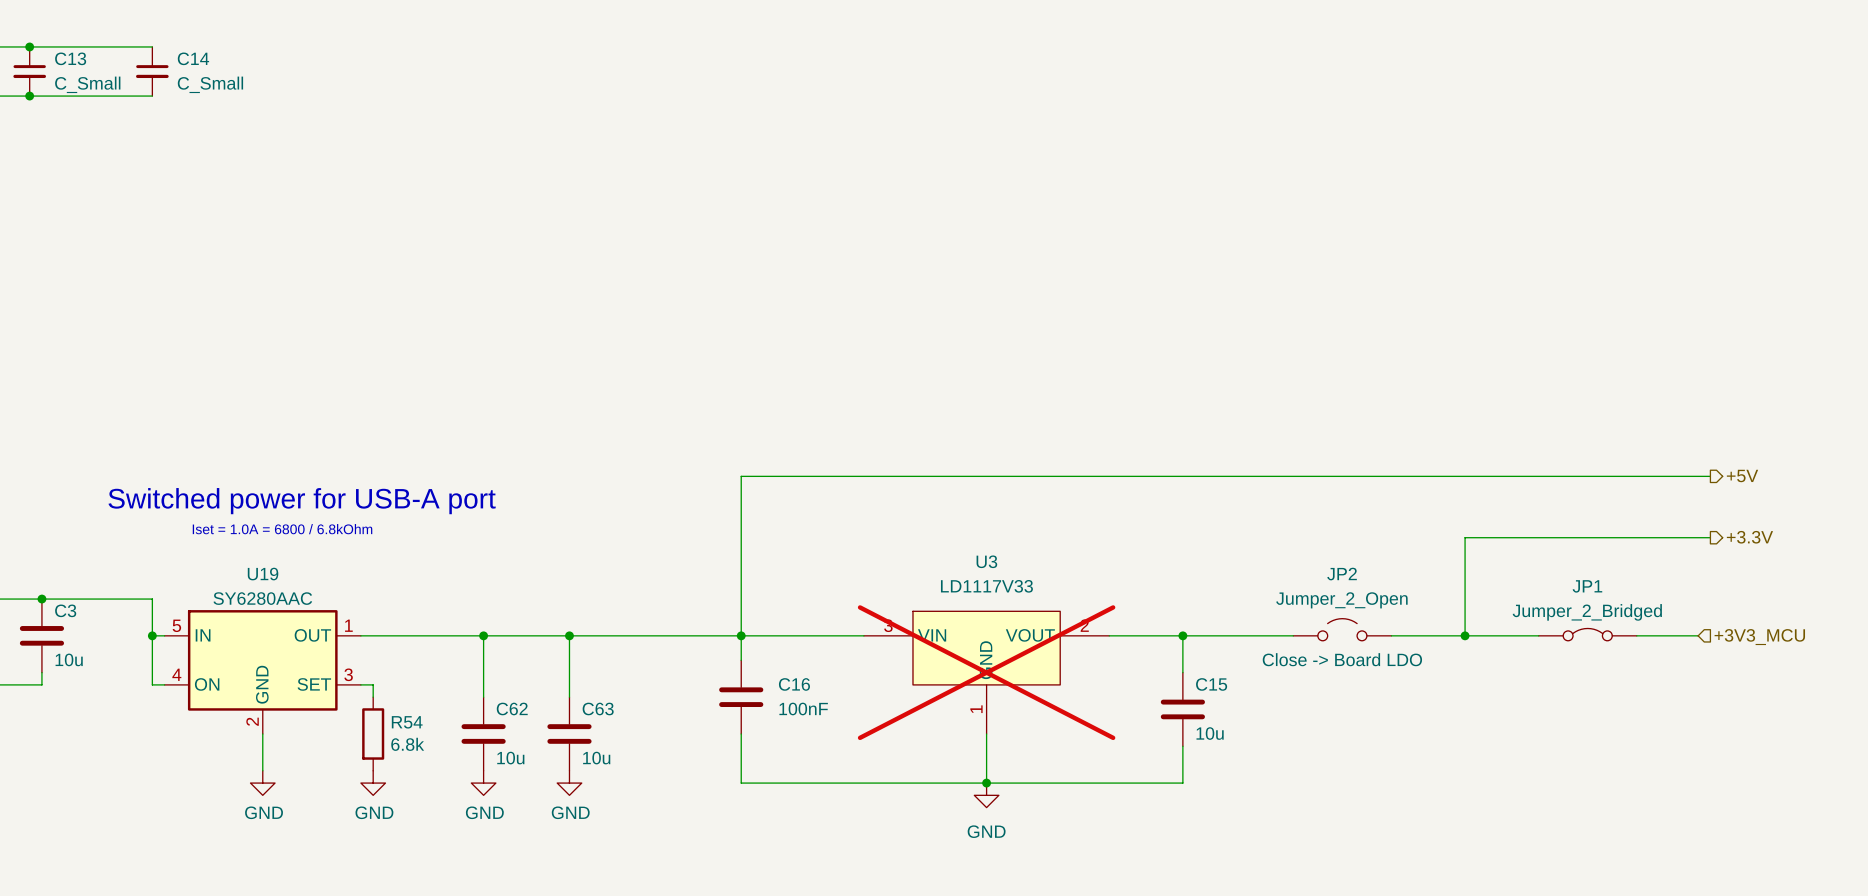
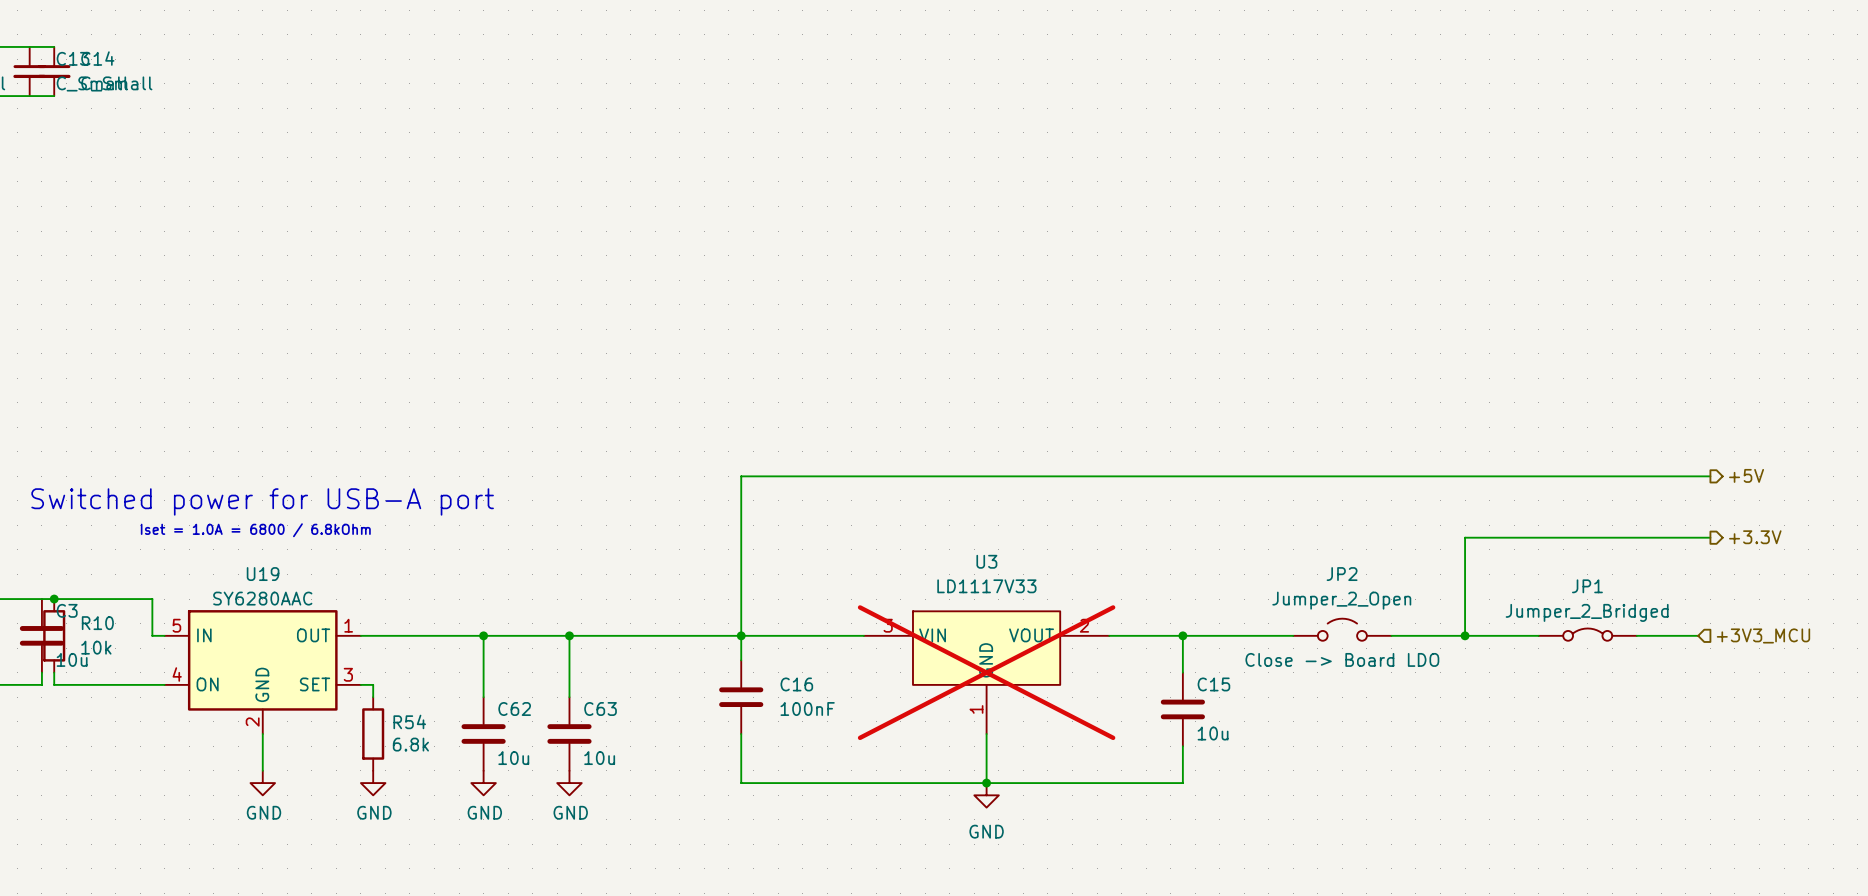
junction: (29, 46) -> none
wire: (54, 46) (152, 46) -> none
C14 position: (152, 71) -> (54, 71)
junction: (29, 96) -> none
wire: (54, 96) (152, 96) -> none
junction position: (41, 599) -> (54, 599)
R10: none -> 10k (54, 635)
wire: (152, 635) (152, 684) -> (54, 672) (54, 684) (152, 684)
junction: (152, 635) -> none

